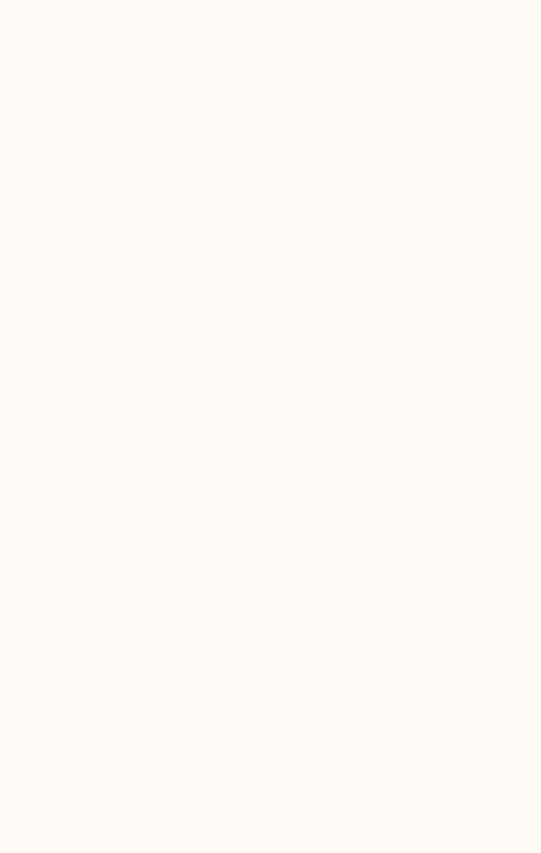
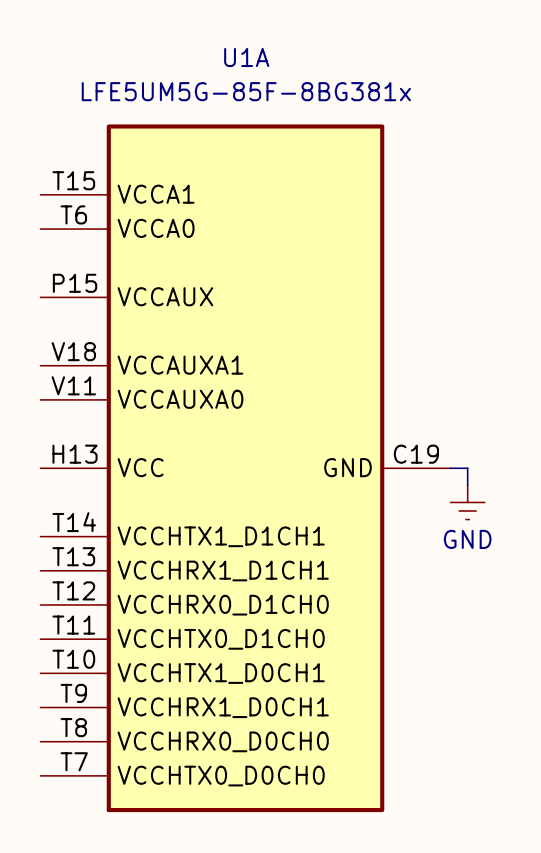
U1A: none -> LFE5UM5G-85F-8BG381x (245, 468)
wire: none -> (450, 468) (467, 468) (467, 485)
power symbol: none -> GND (467, 502)

